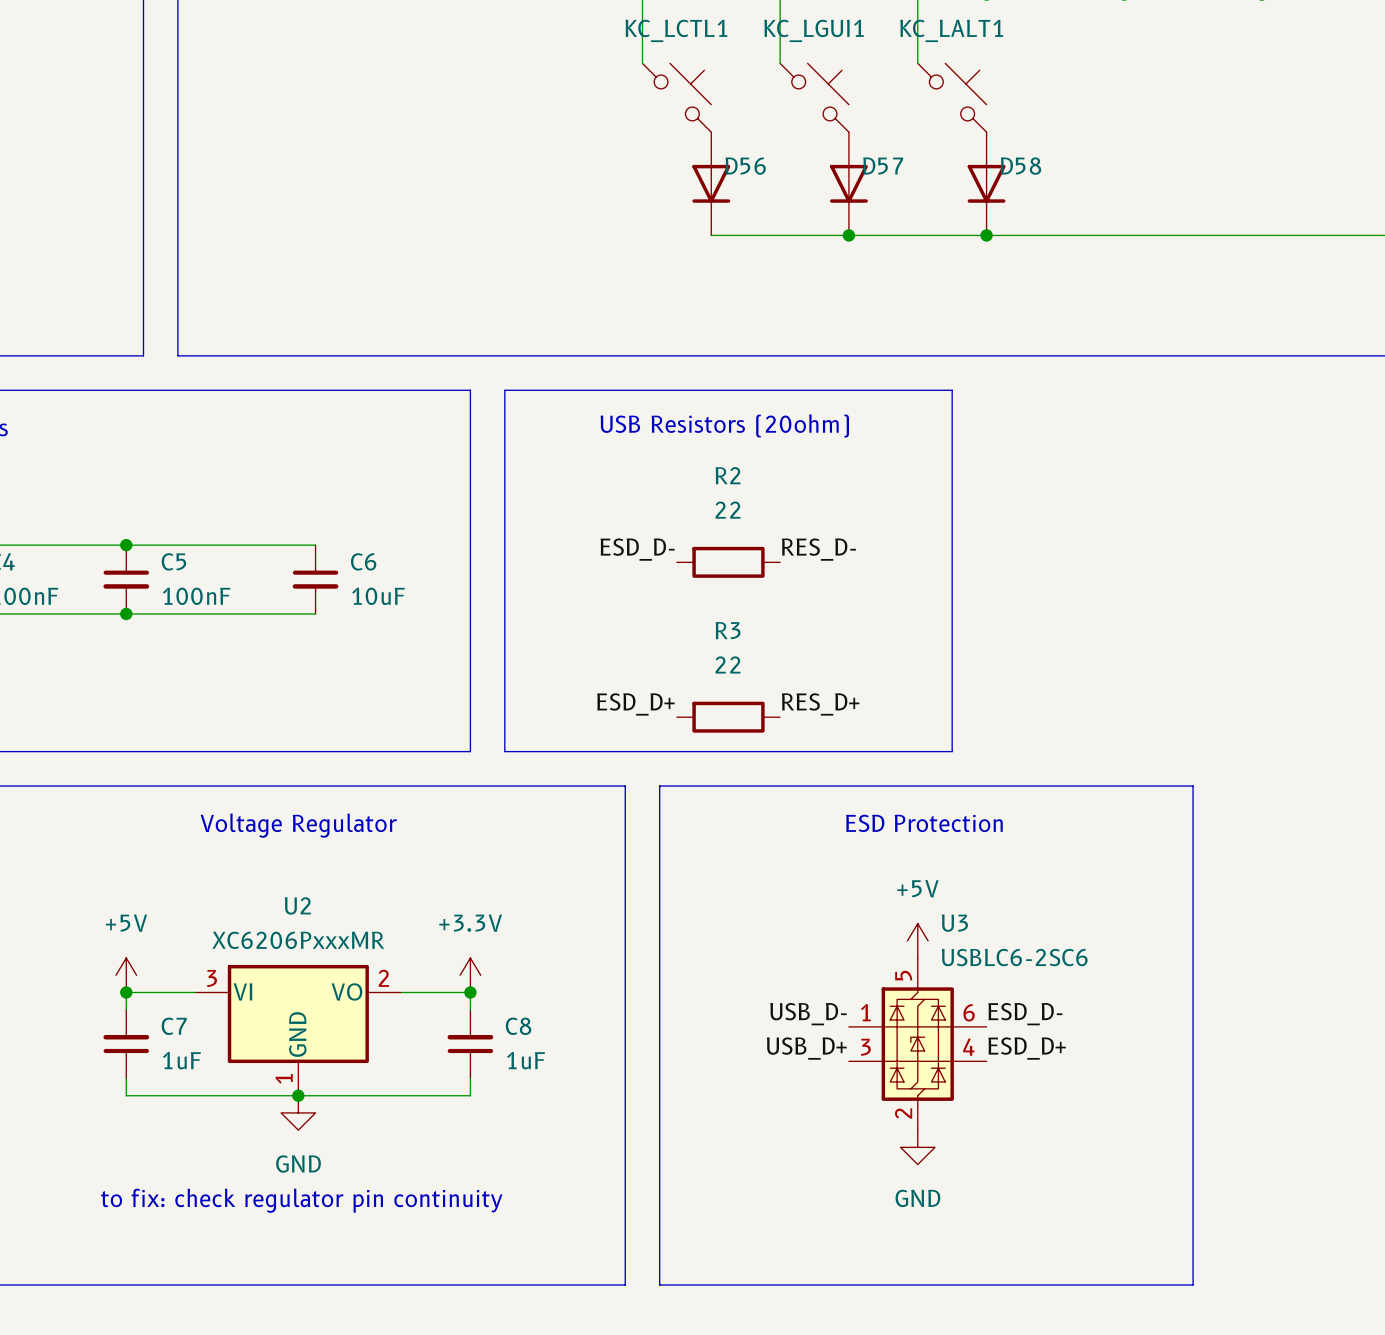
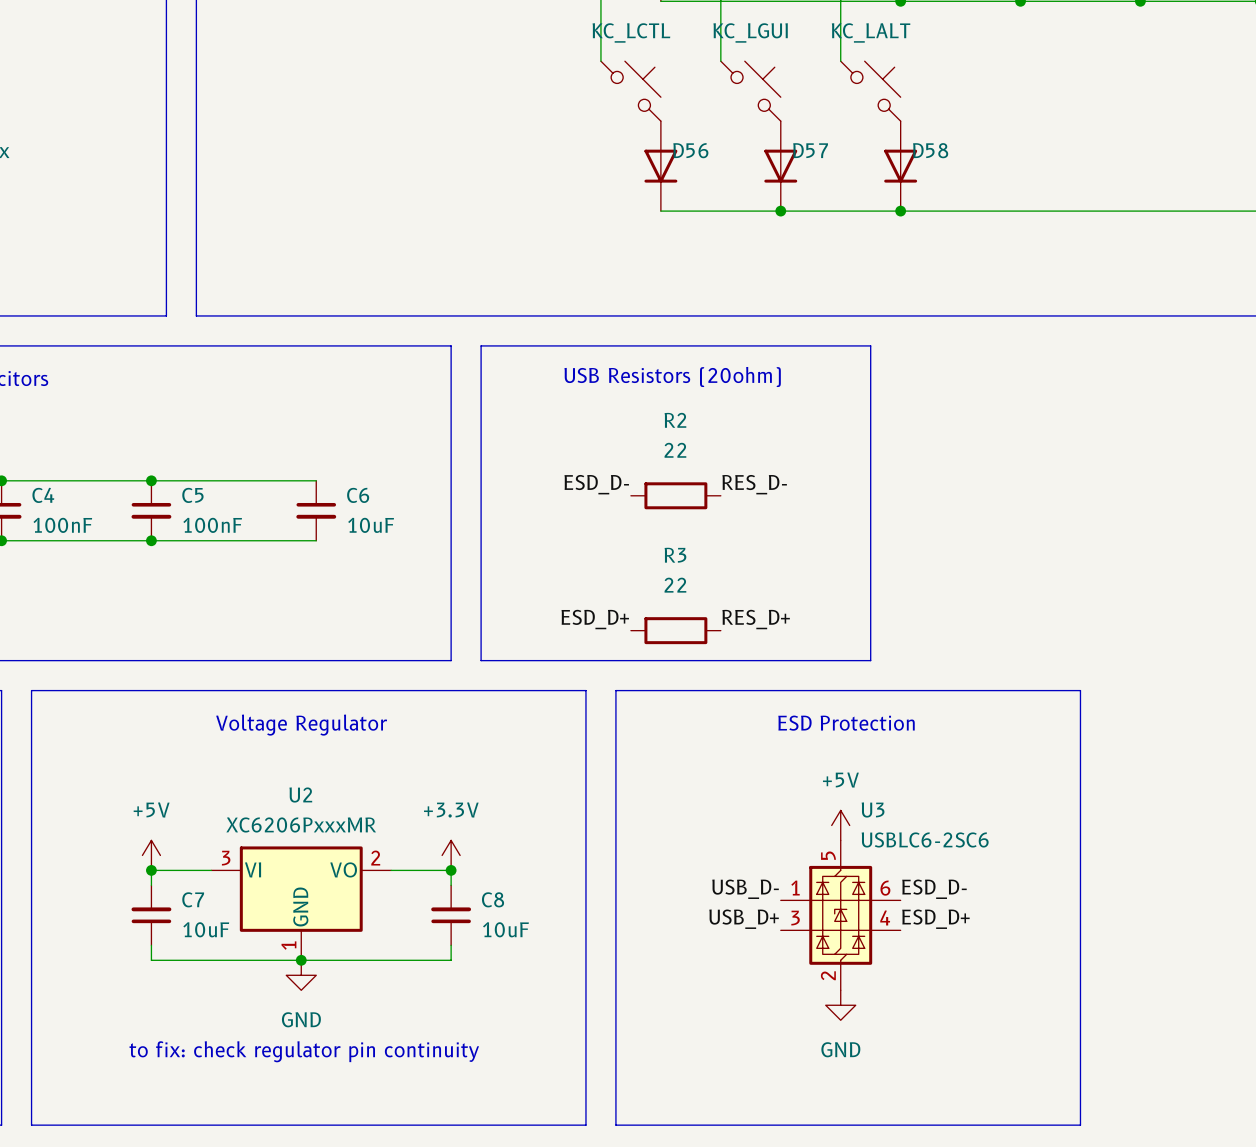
KC_LCTL1 name: KC_LCTL1 (676, 30) -> KC_LCTL (631, 32)
KC_LGUI1 name: KC_LGUI1 (814, 30) -> KC_LGUI (750, 32)
KC_LALT1 name: KC_LALT1 (951, 30) -> KC_LALT (871, 32)
C7 value: 1uF (181, 1060) -> 10uF (206, 929)
C8 value: 1uF (526, 1060) -> 10uF (505, 929)

